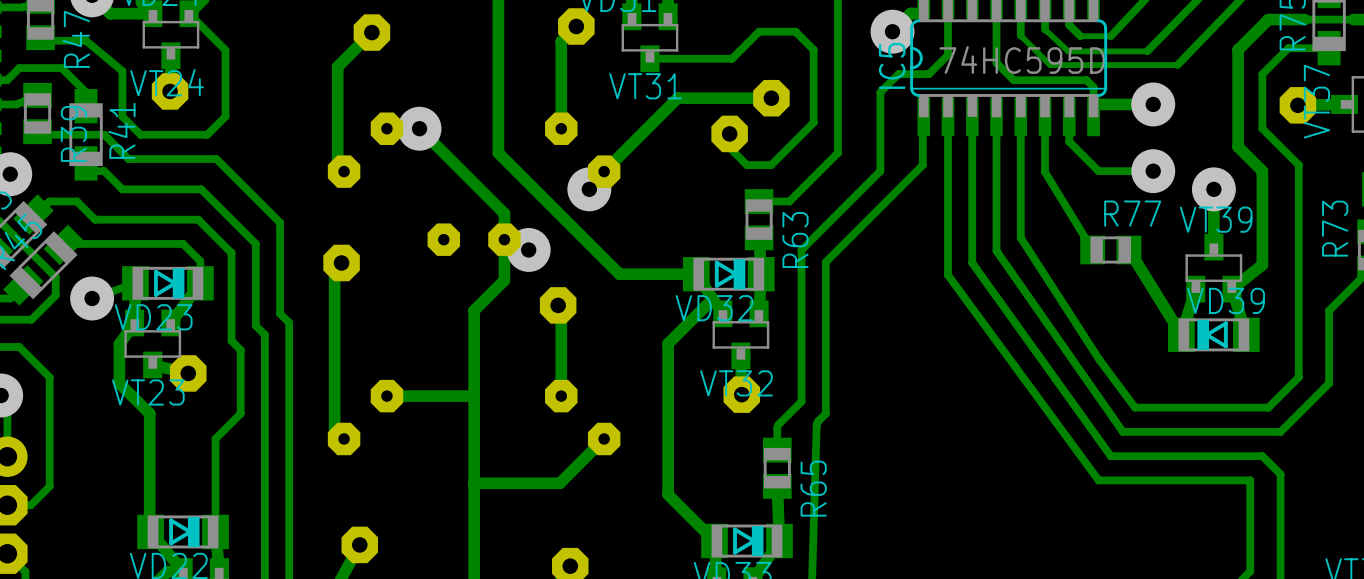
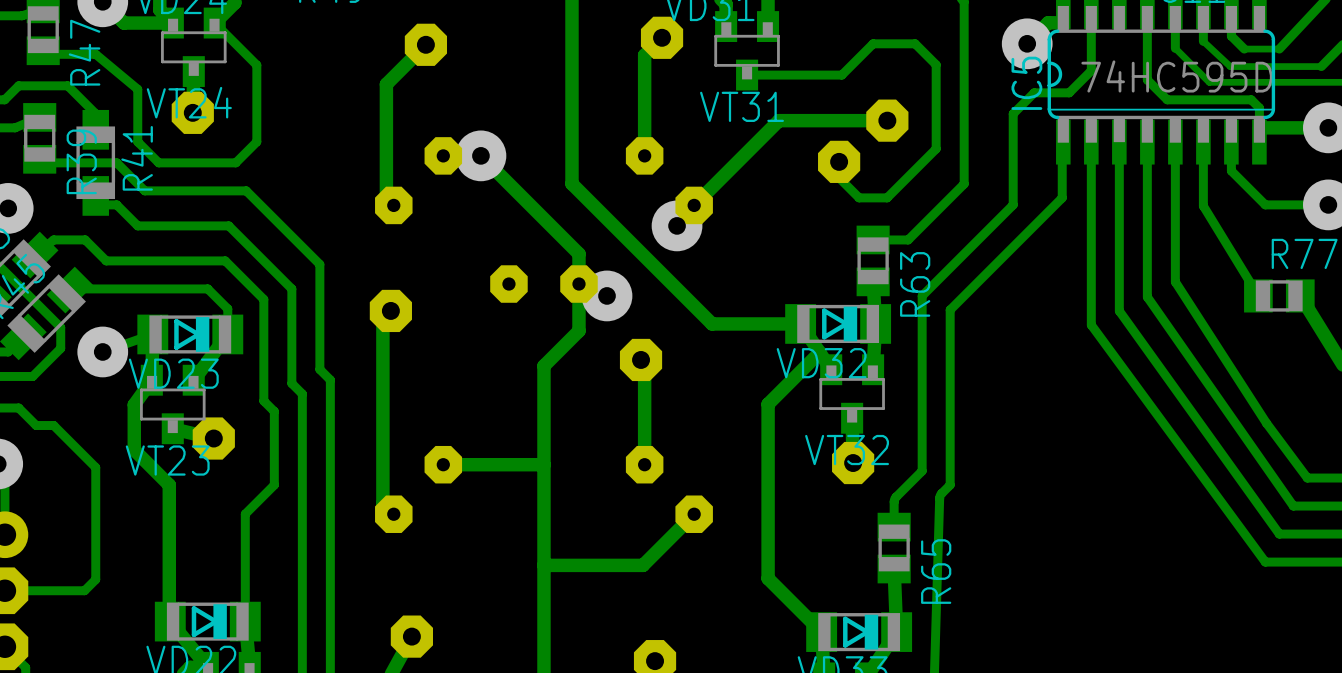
track: (34, 362) (49, 377) (49, 486) (30, 505) -> (36, 425) (53, 425) (95, 467) (95, 579) (84, 590) (32, 590)

